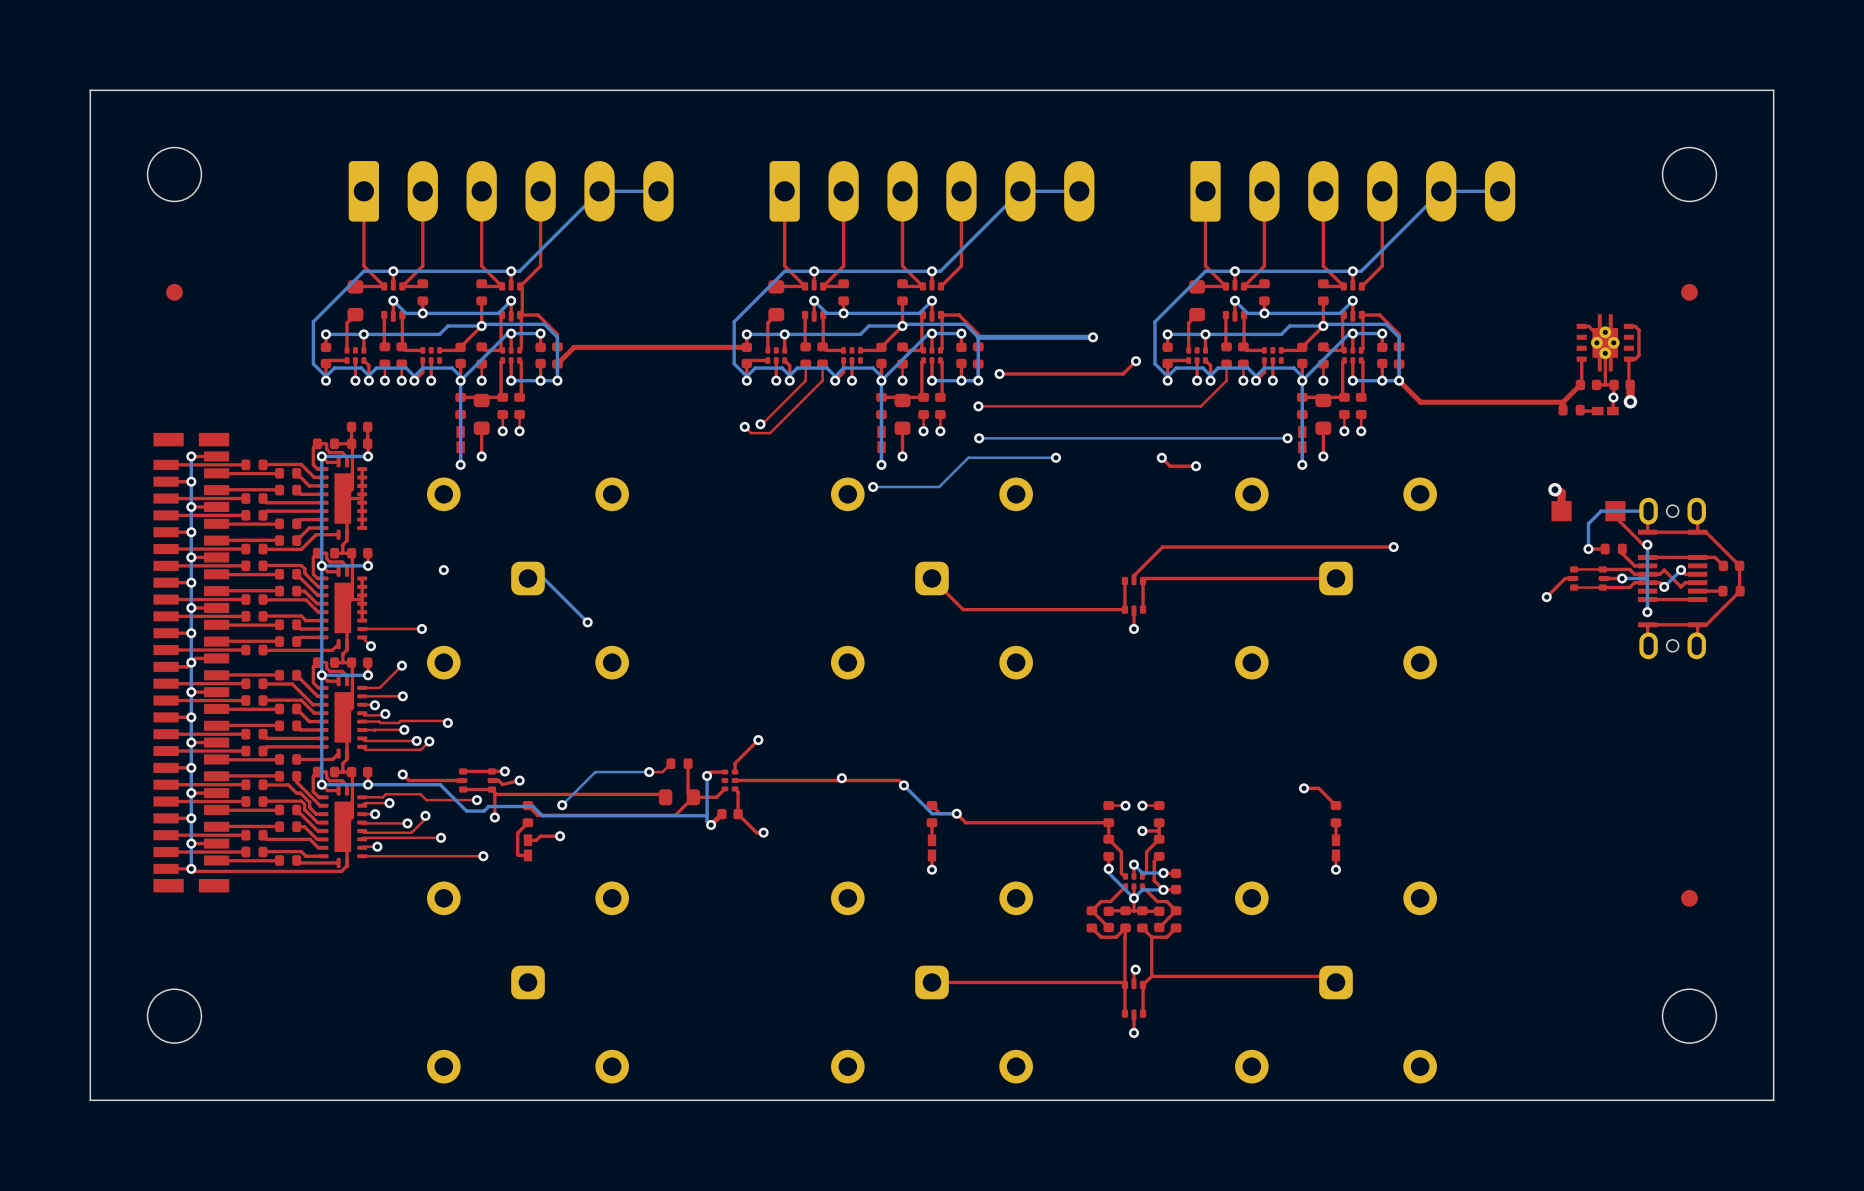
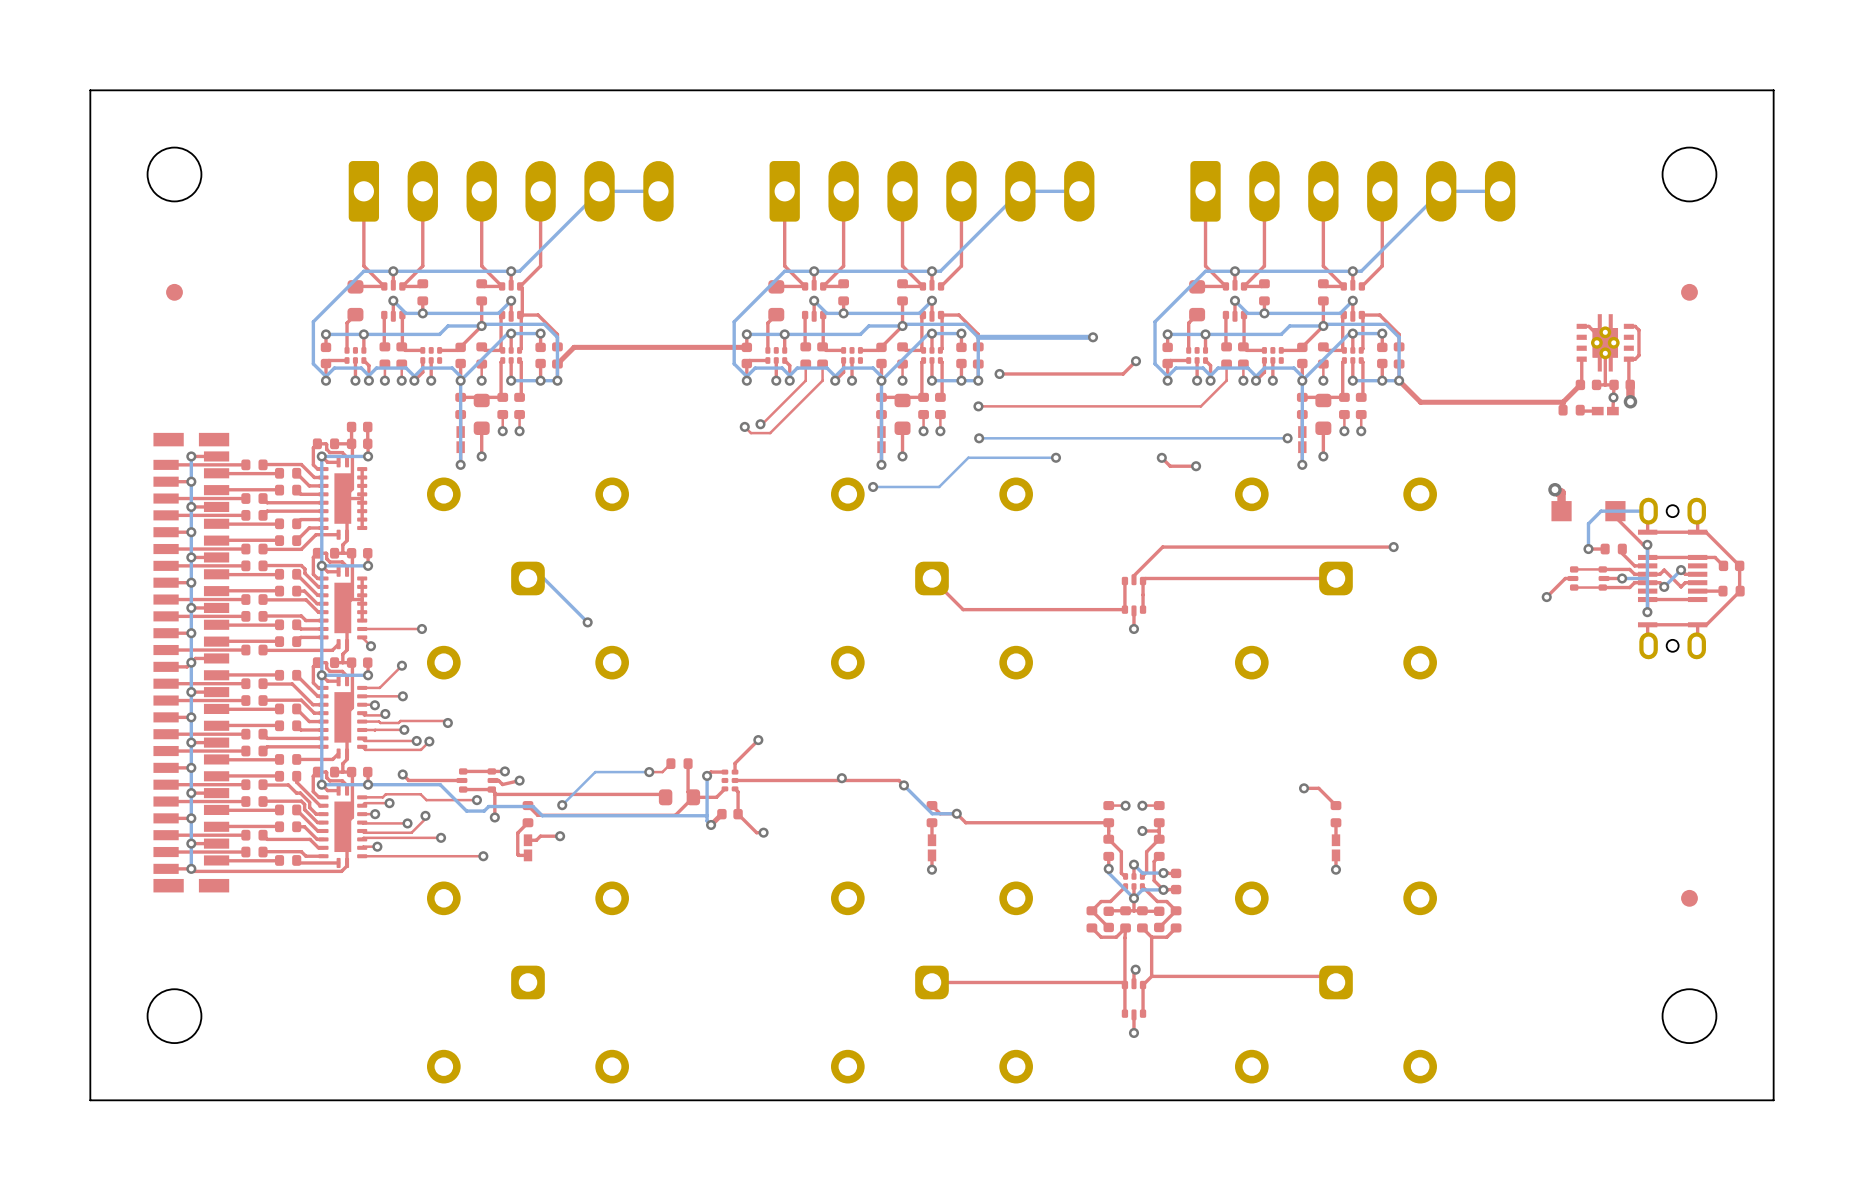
via: (443, 570) -> none

